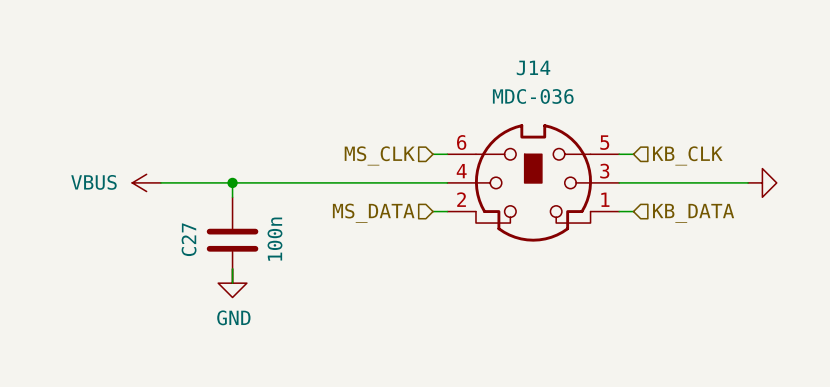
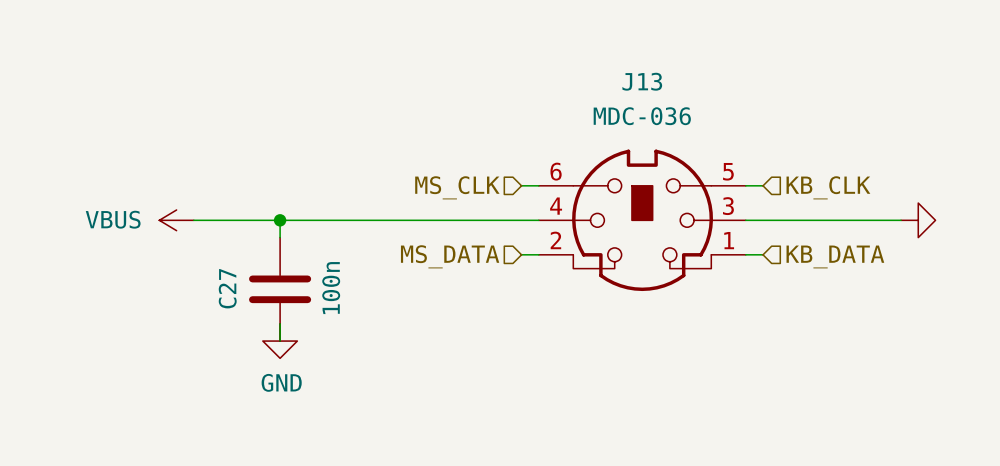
J14 name: J14 (533, 67) -> J13 (642, 81)

